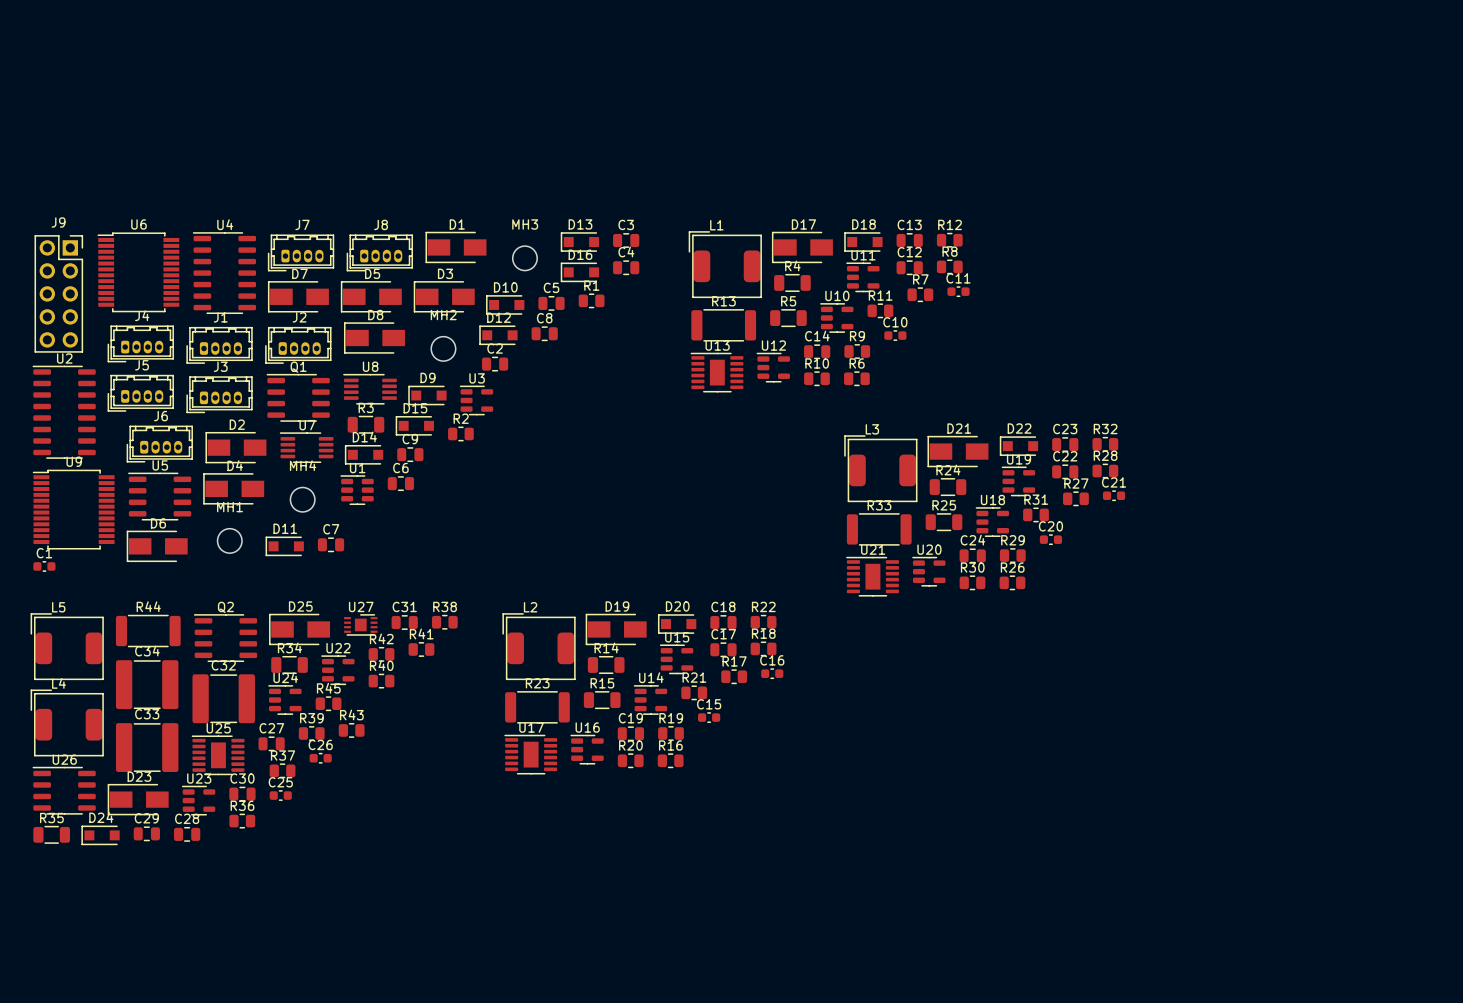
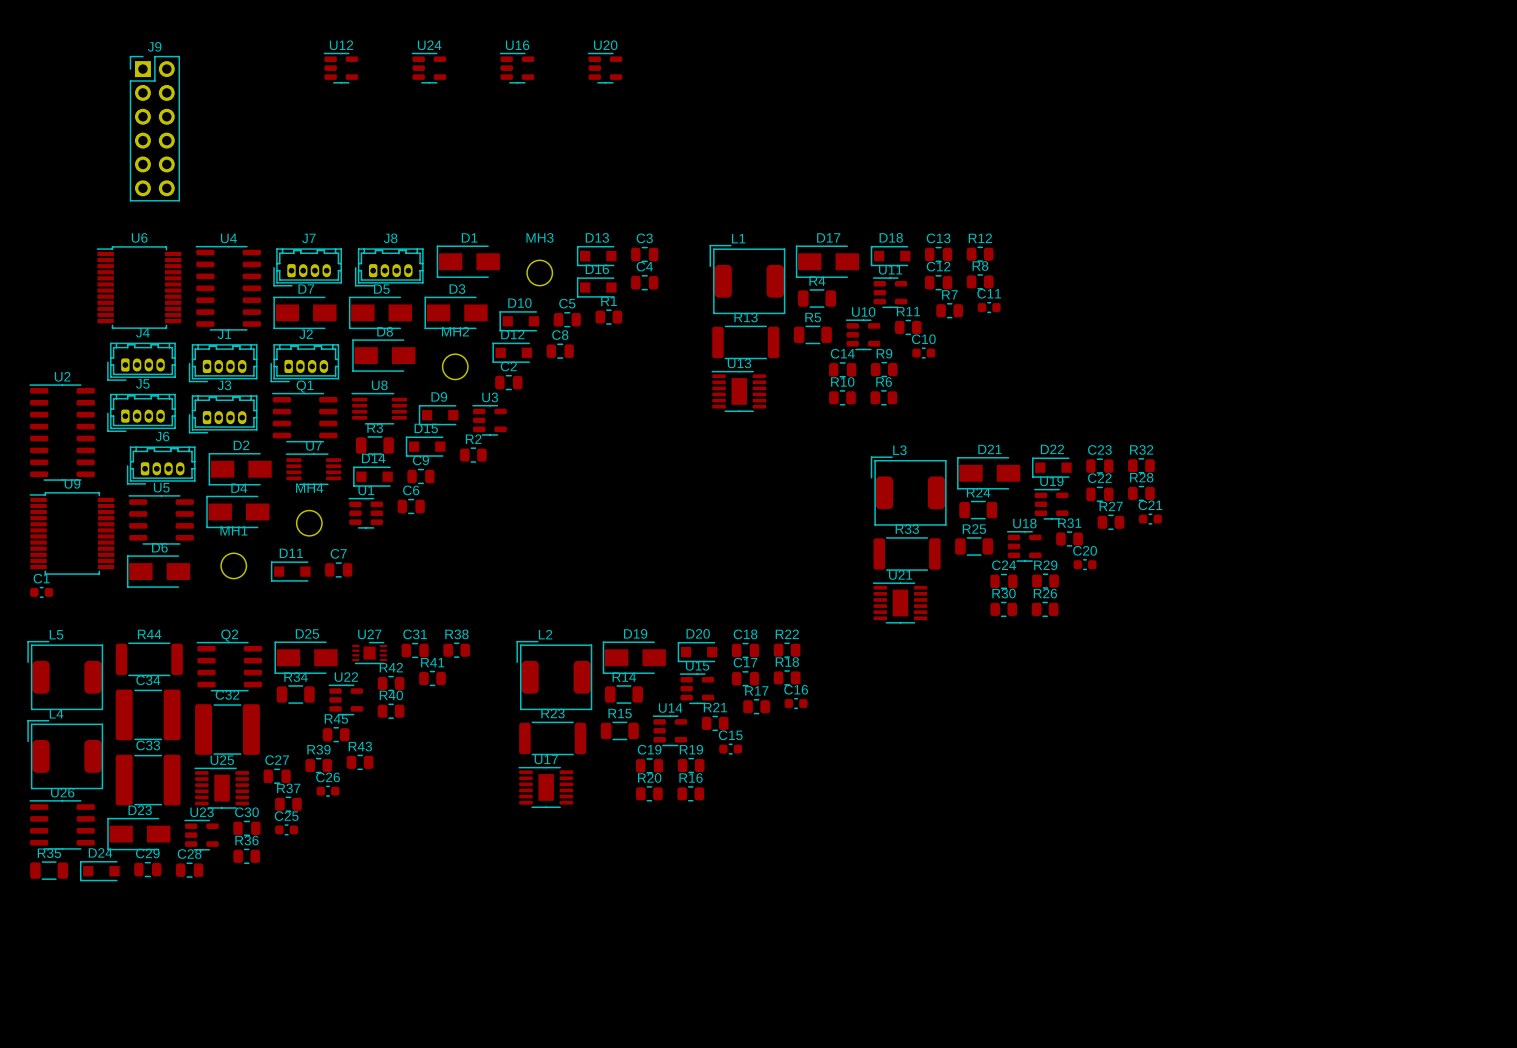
J9 footprint: [34, 235, 83, 353] -> [129, 56, 180, 202]
U12 position: (773, 367) -> (341, 68)
U20 position: (928, 571) -> (605, 68)
U24 position: (285, 700) -> (429, 68)
U16 position: (587, 749) -> (517, 68)

